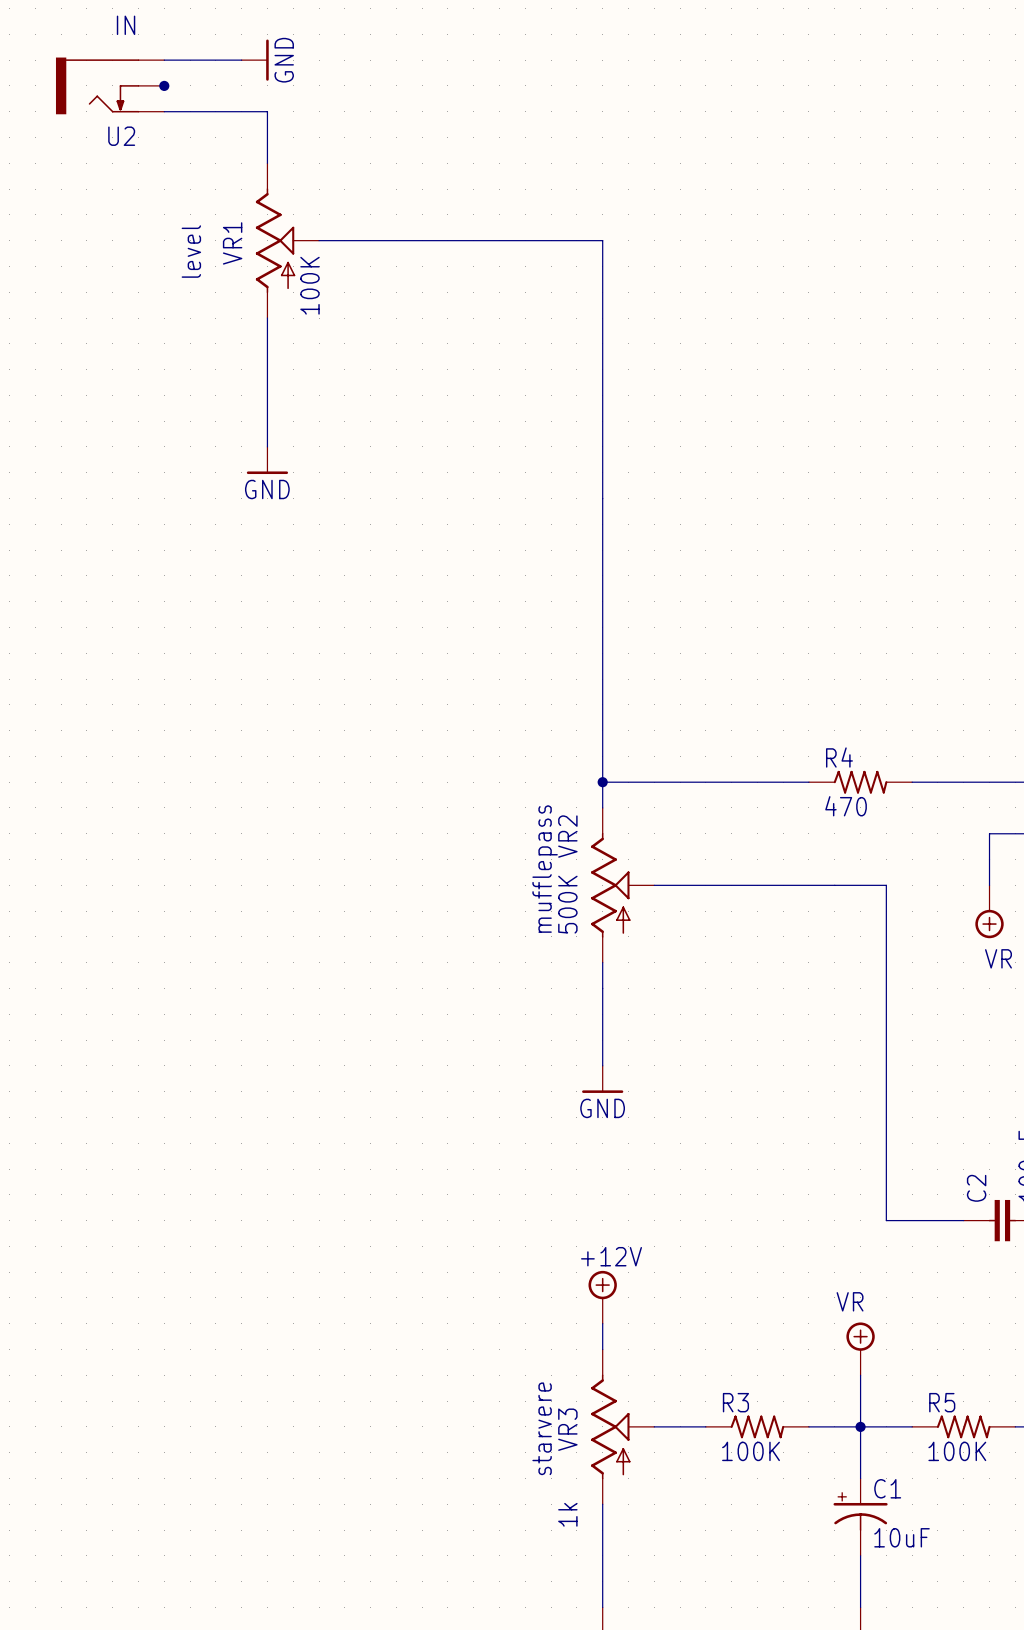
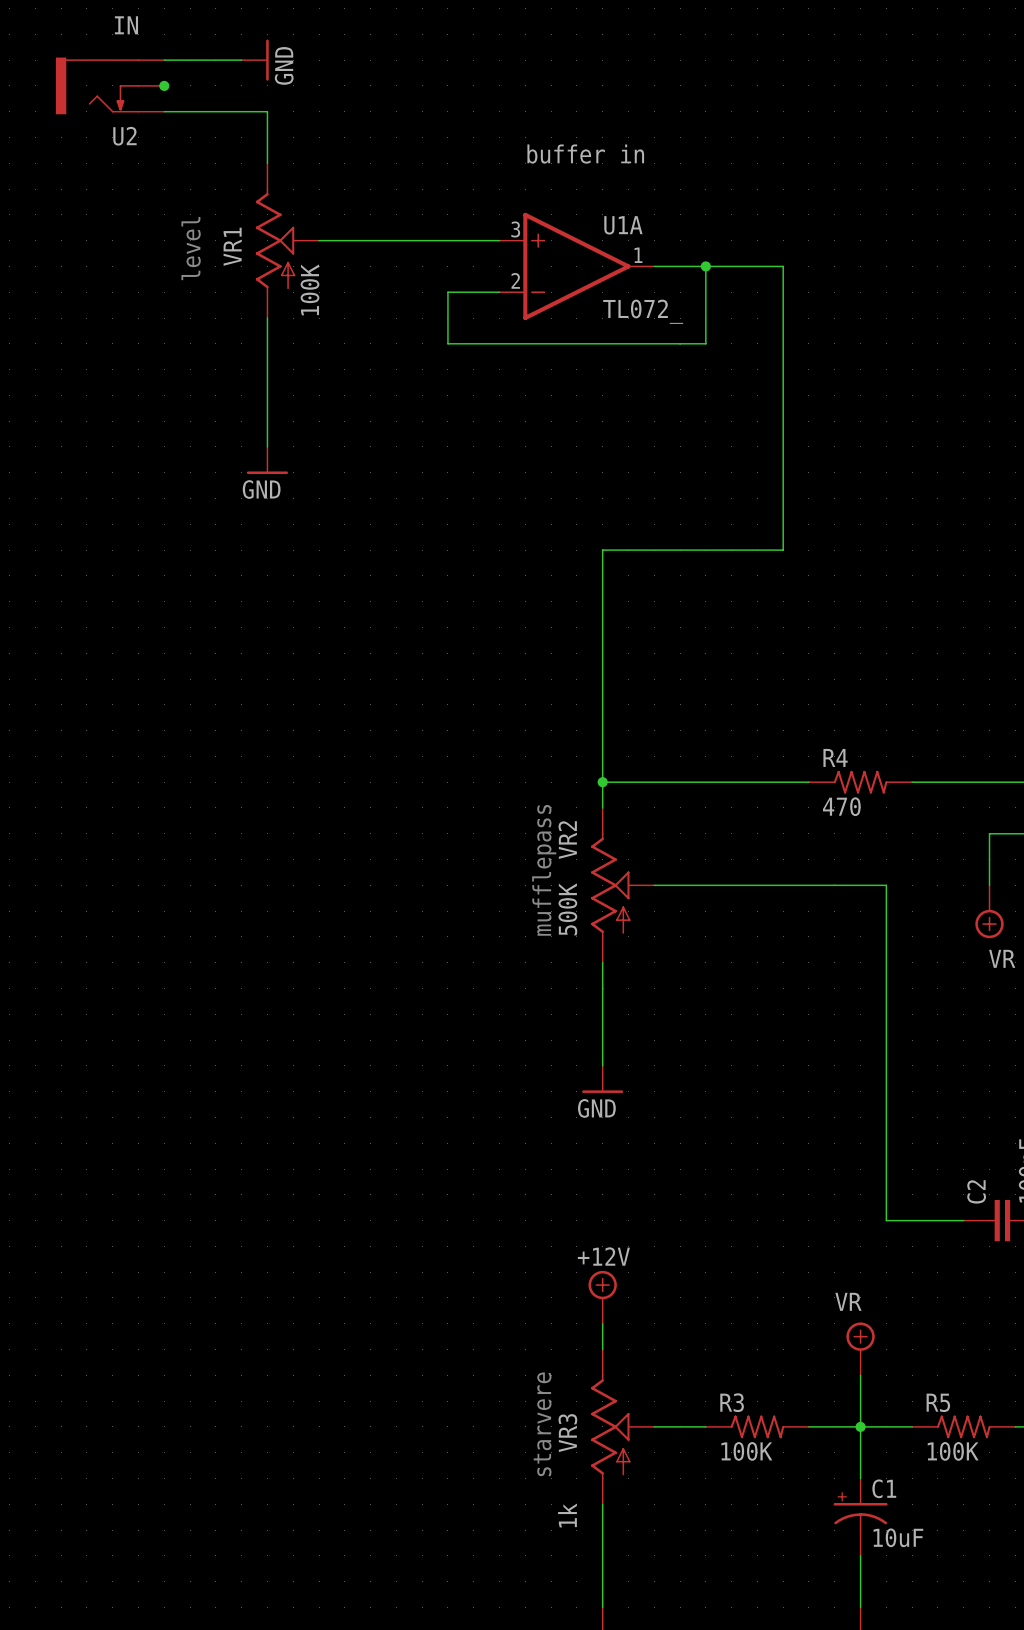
text: none -> buffer in (585, 154)
wire: (499, 240) (602, 240) (602, 550) -> (654, 266) (783, 266) (783, 550) (602, 550)
U1A: none -> TL072_ (576, 266)
wire: none -> (705, 266) (705, 343) (447, 343) (447, 292) (499, 292)
junction: none -> (705, 266)

